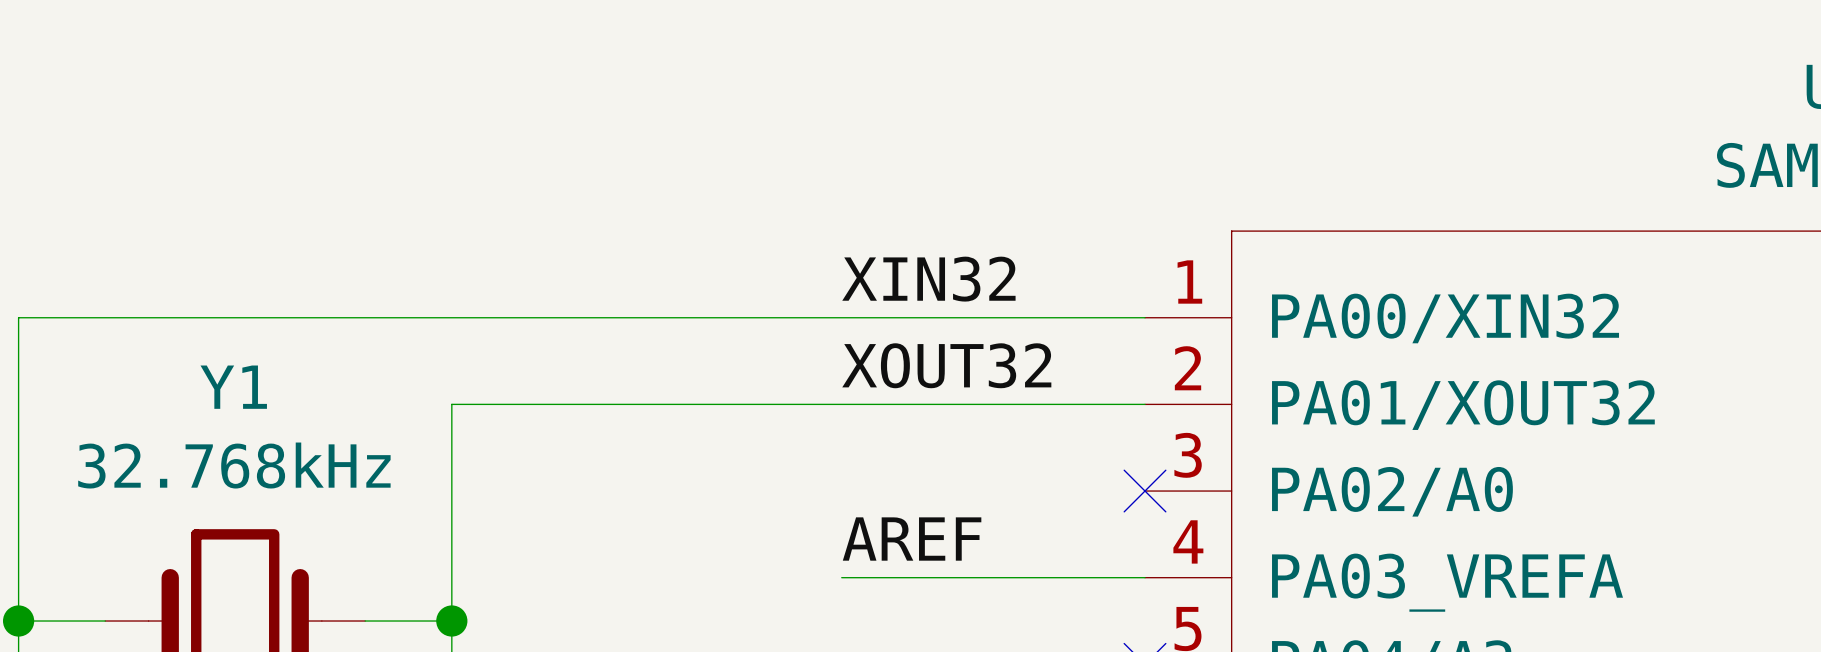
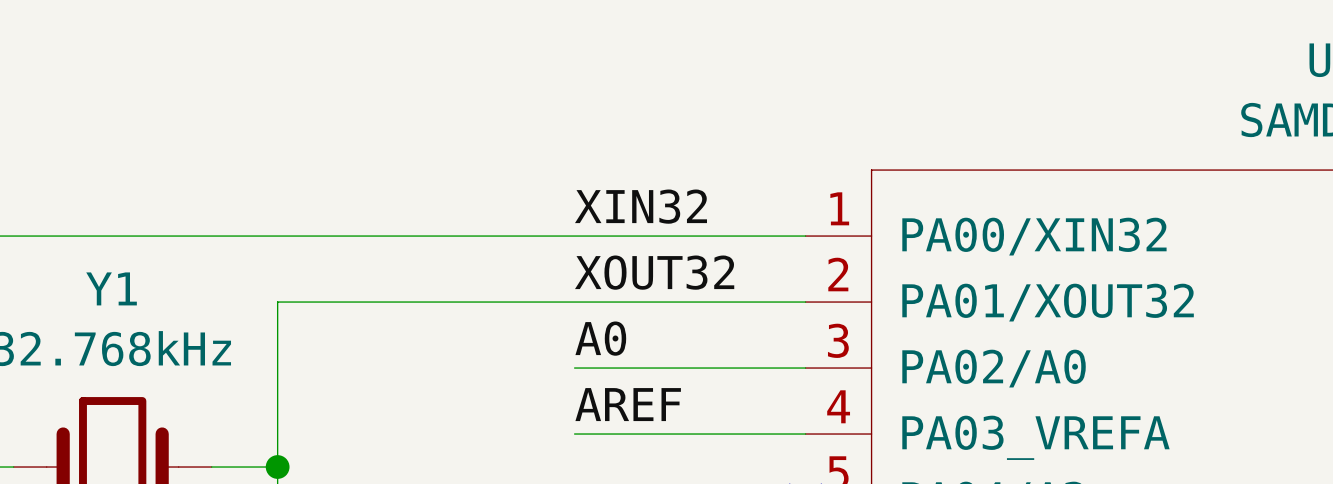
label: none -> A0 (600, 338)
wire: none -> (574, 368) (805, 368)
no-connect mark: (1145, 491) -> none

